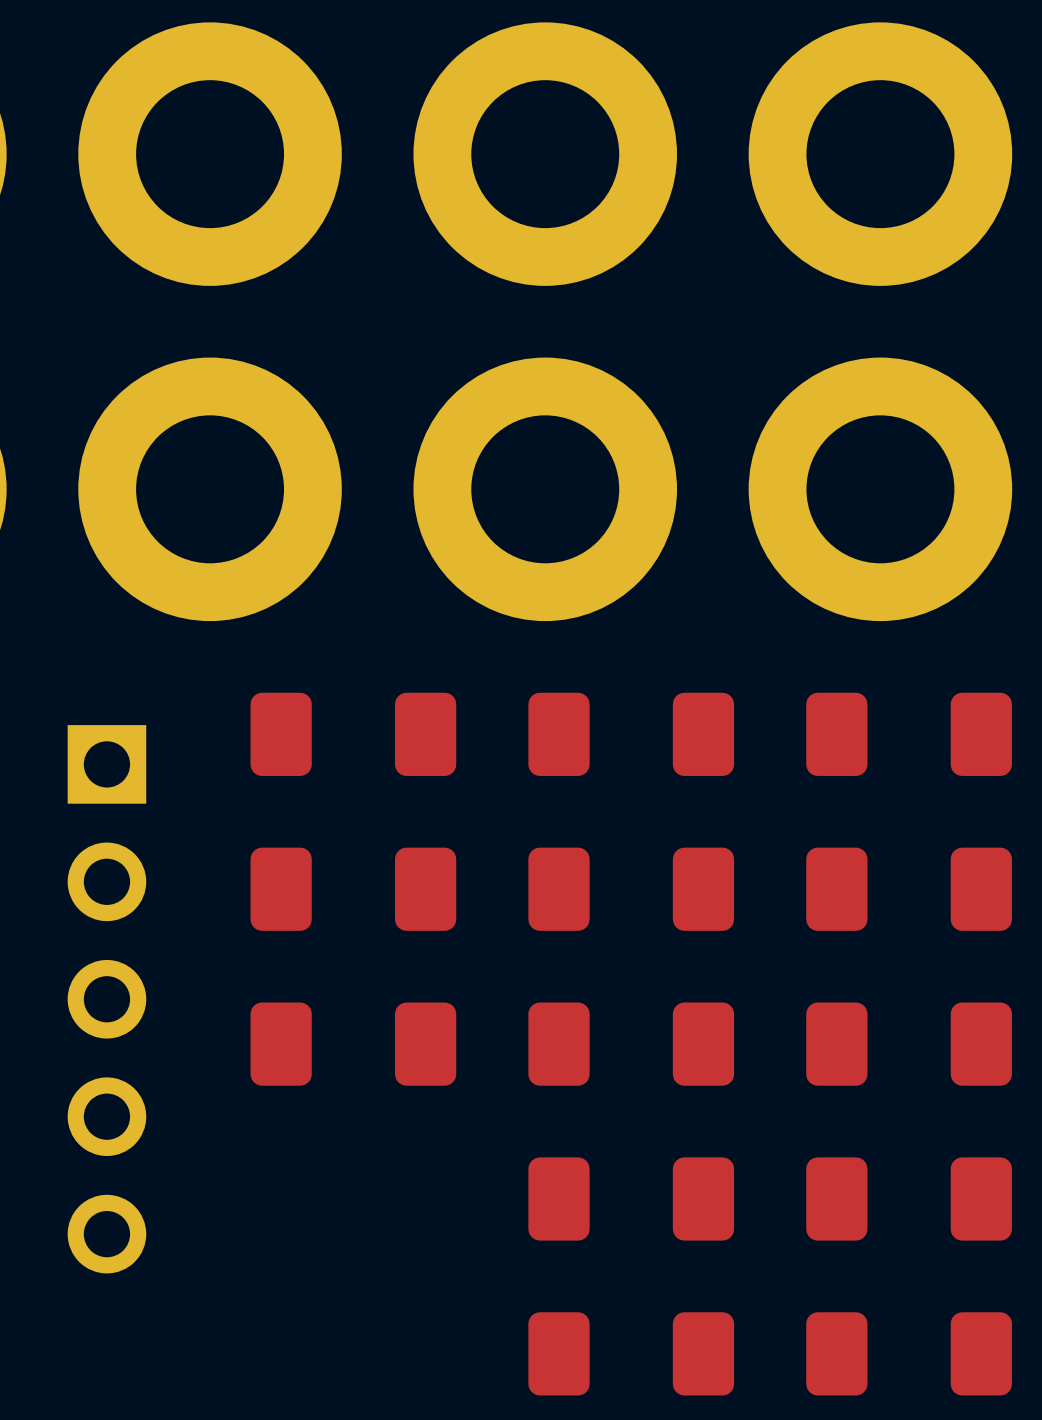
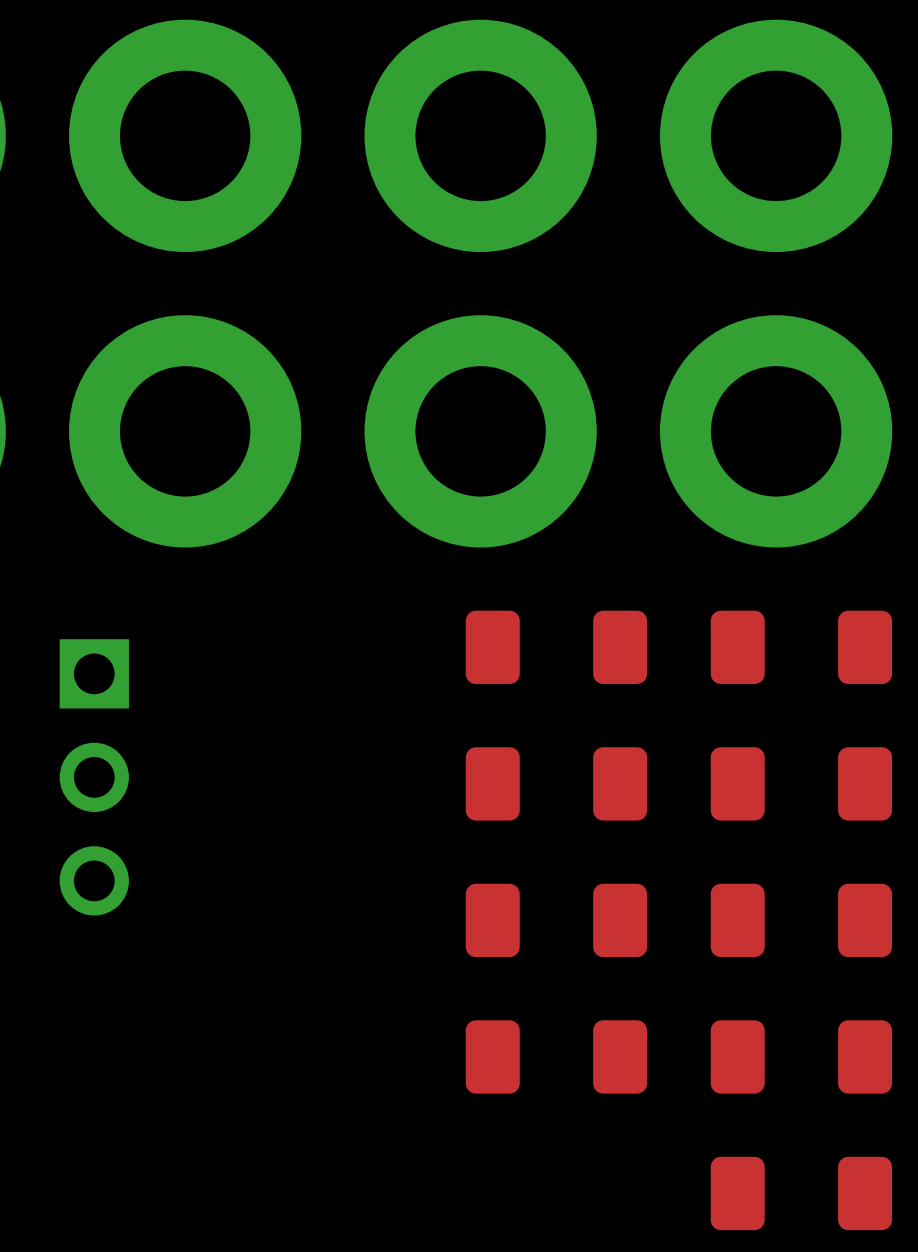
part: (353, 734) -> none
part: (353, 889) -> none
part: (106, 999) -> none
part: (353, 1044) -> none
part: (631, 1353) -> none

